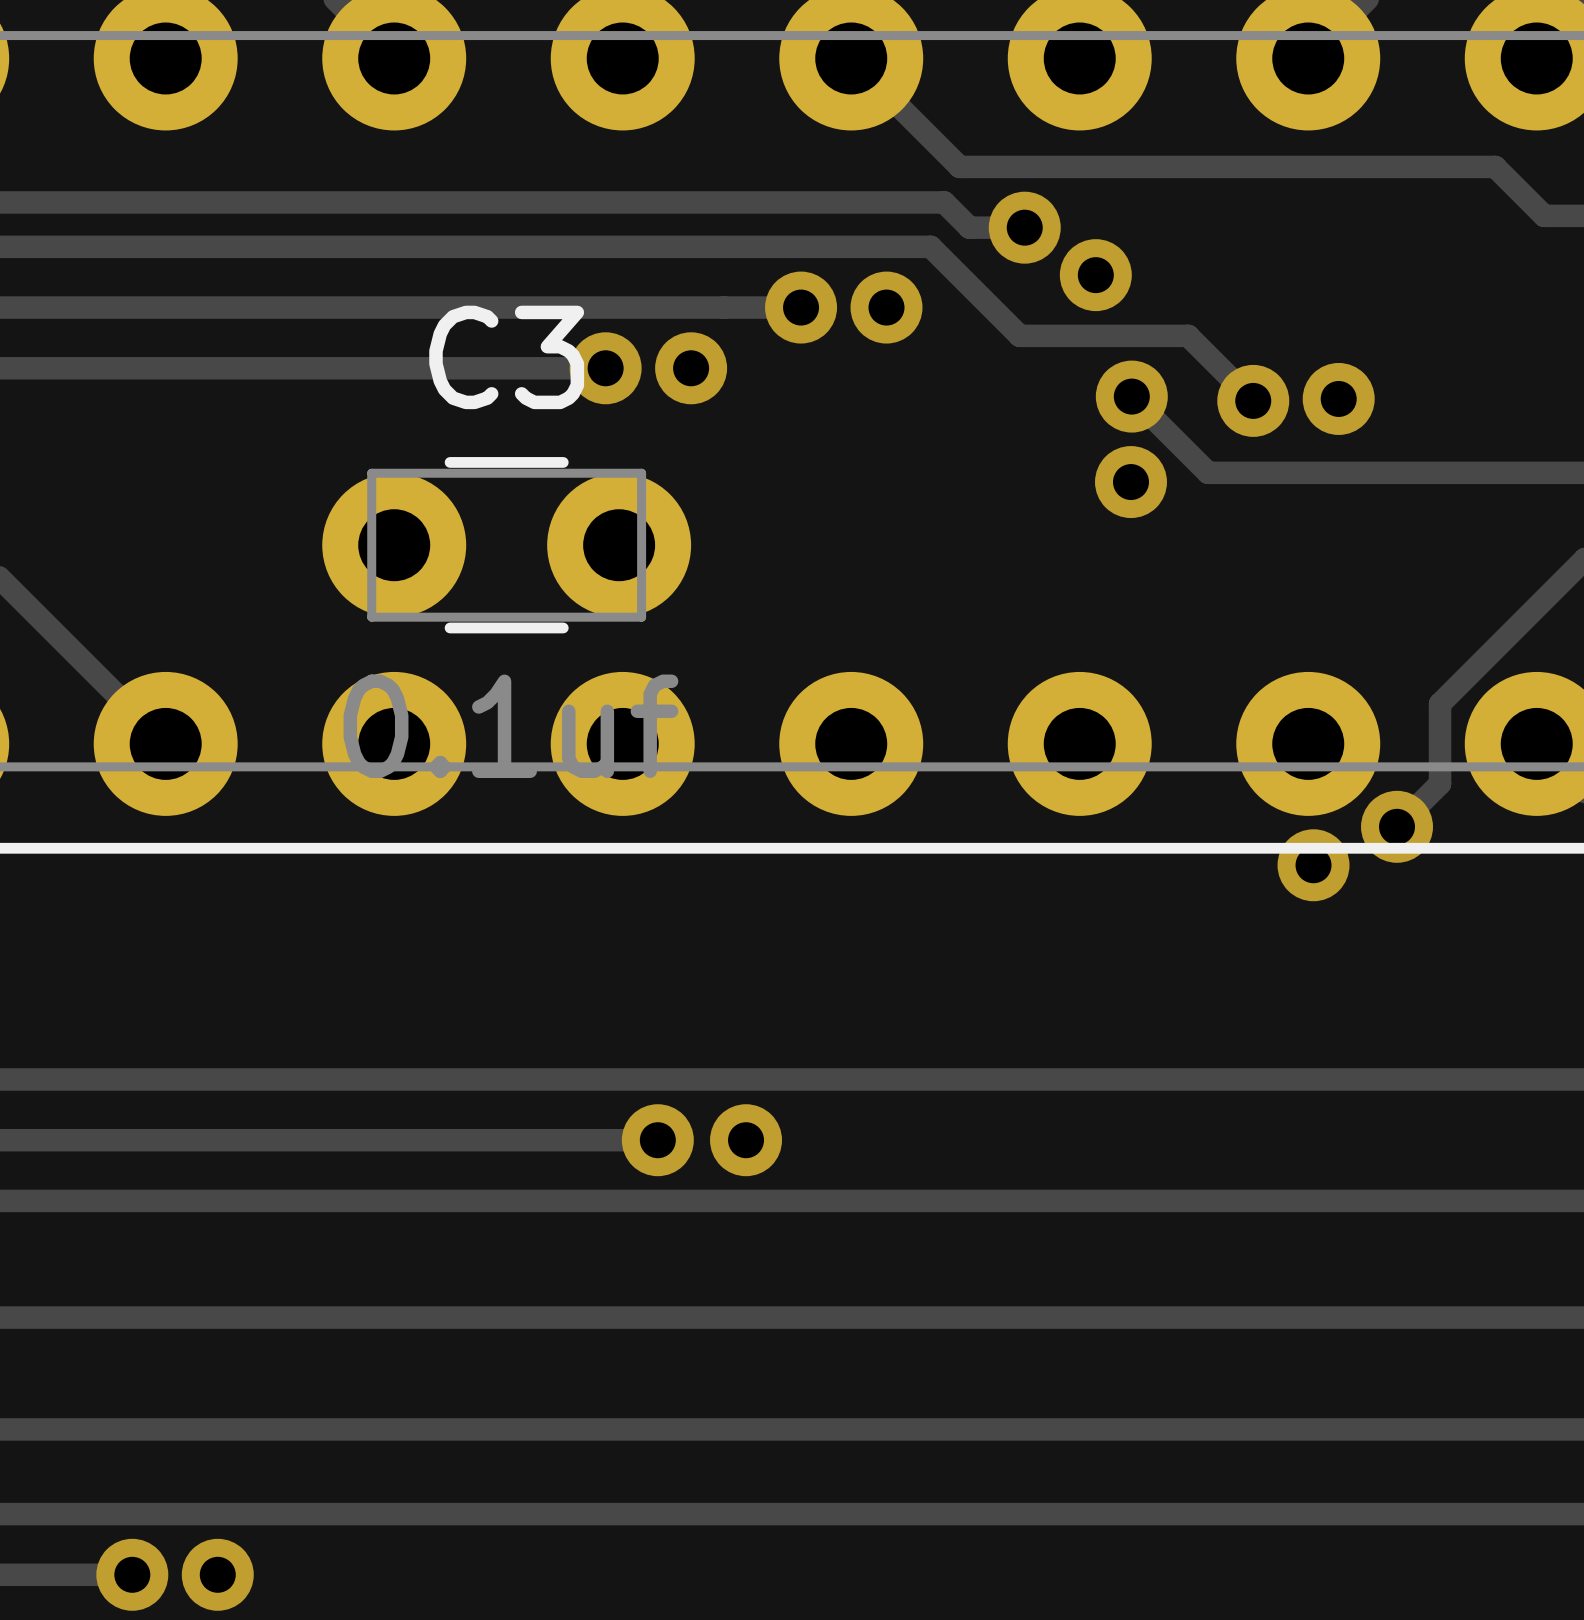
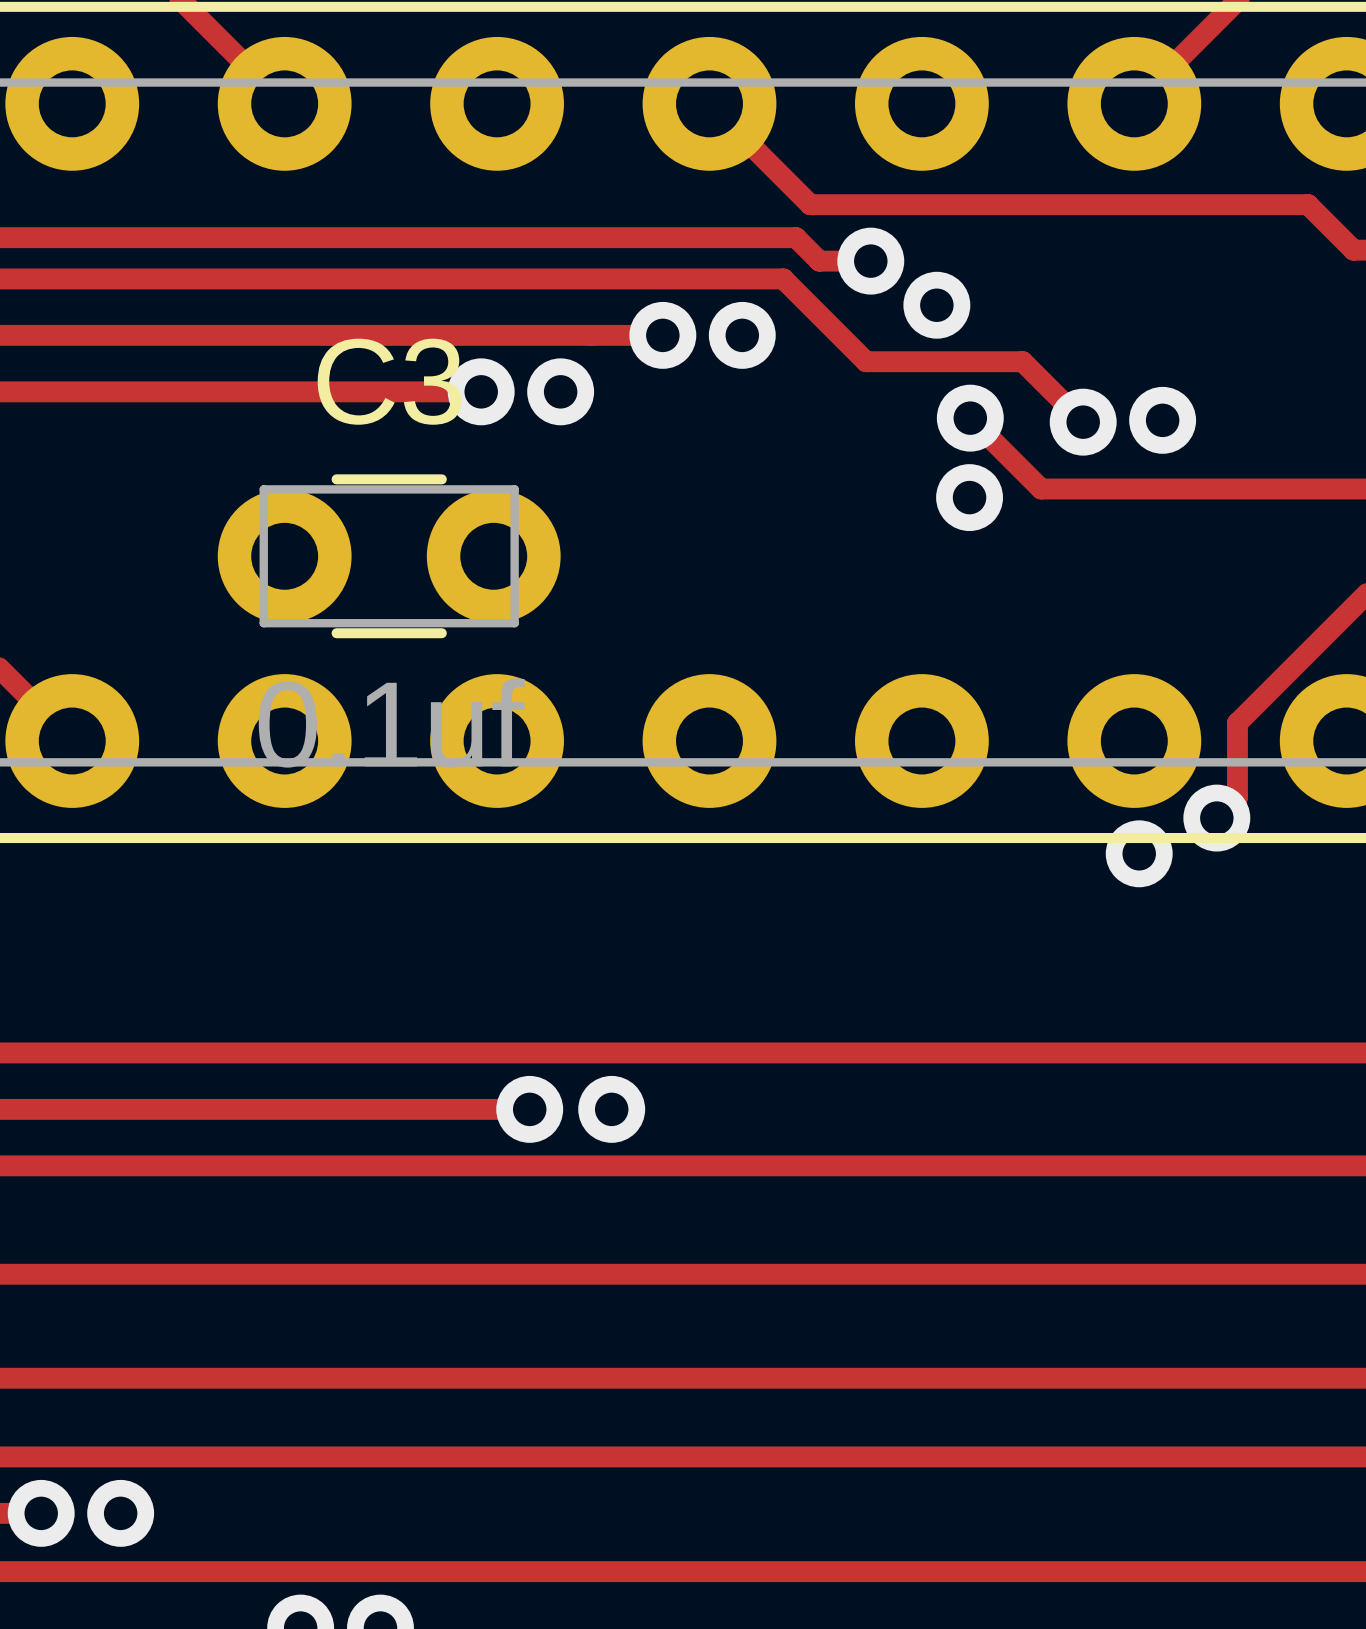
track: (1440, 703) (1440, 783) (1419, 804) -> (1256, 703) (1237, 723) (1237, 797)

